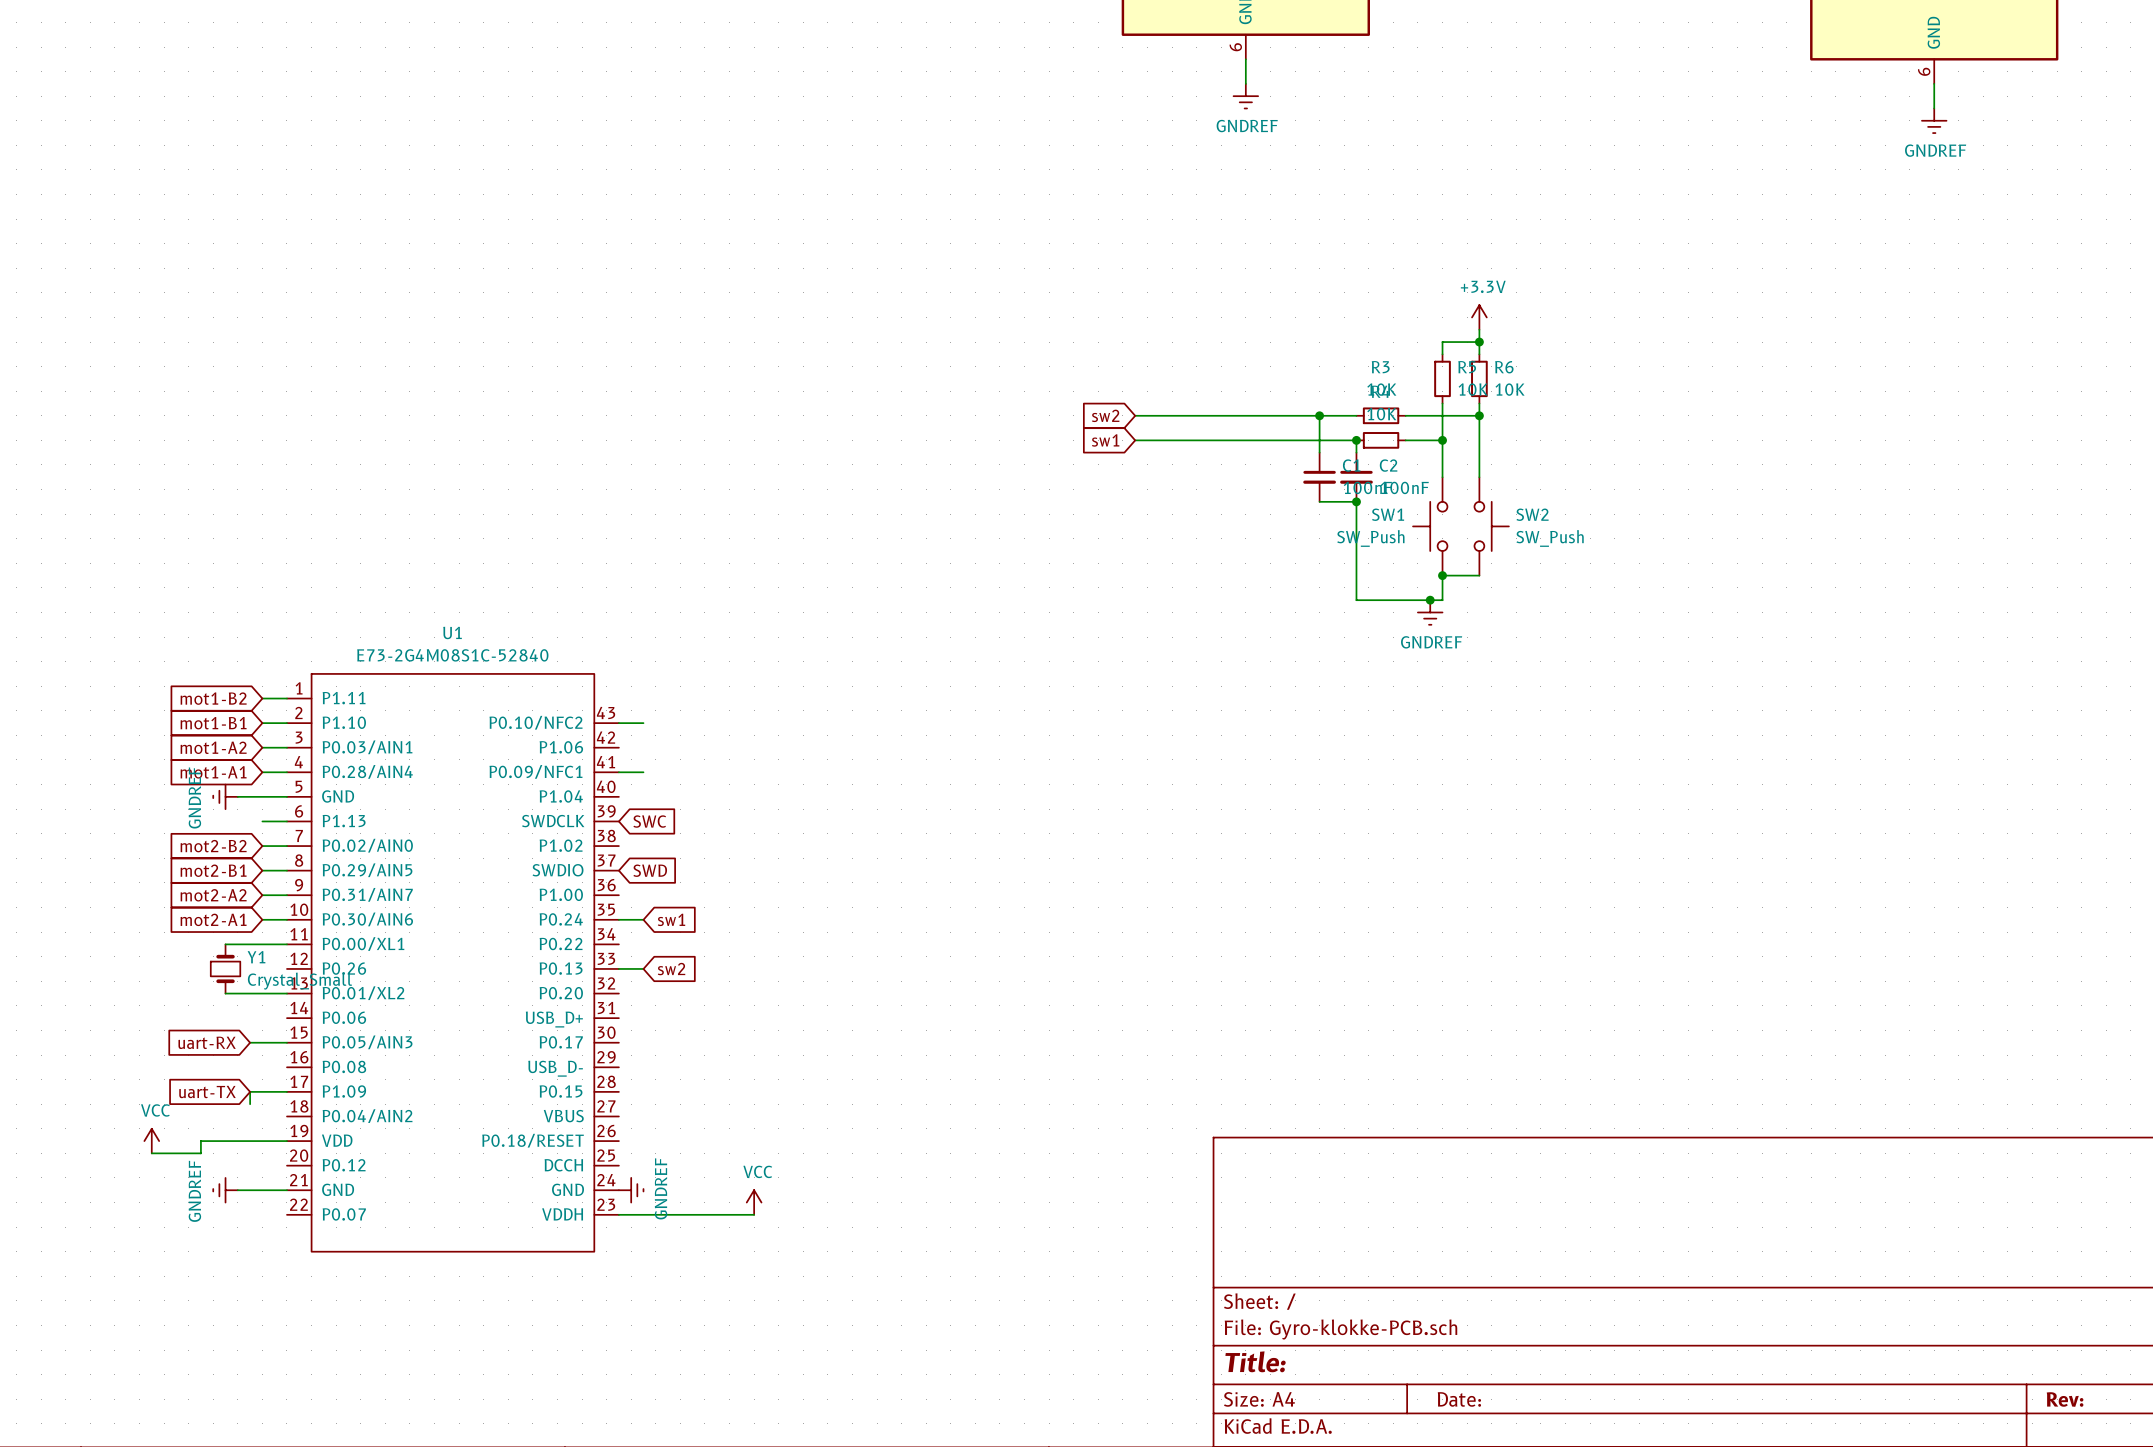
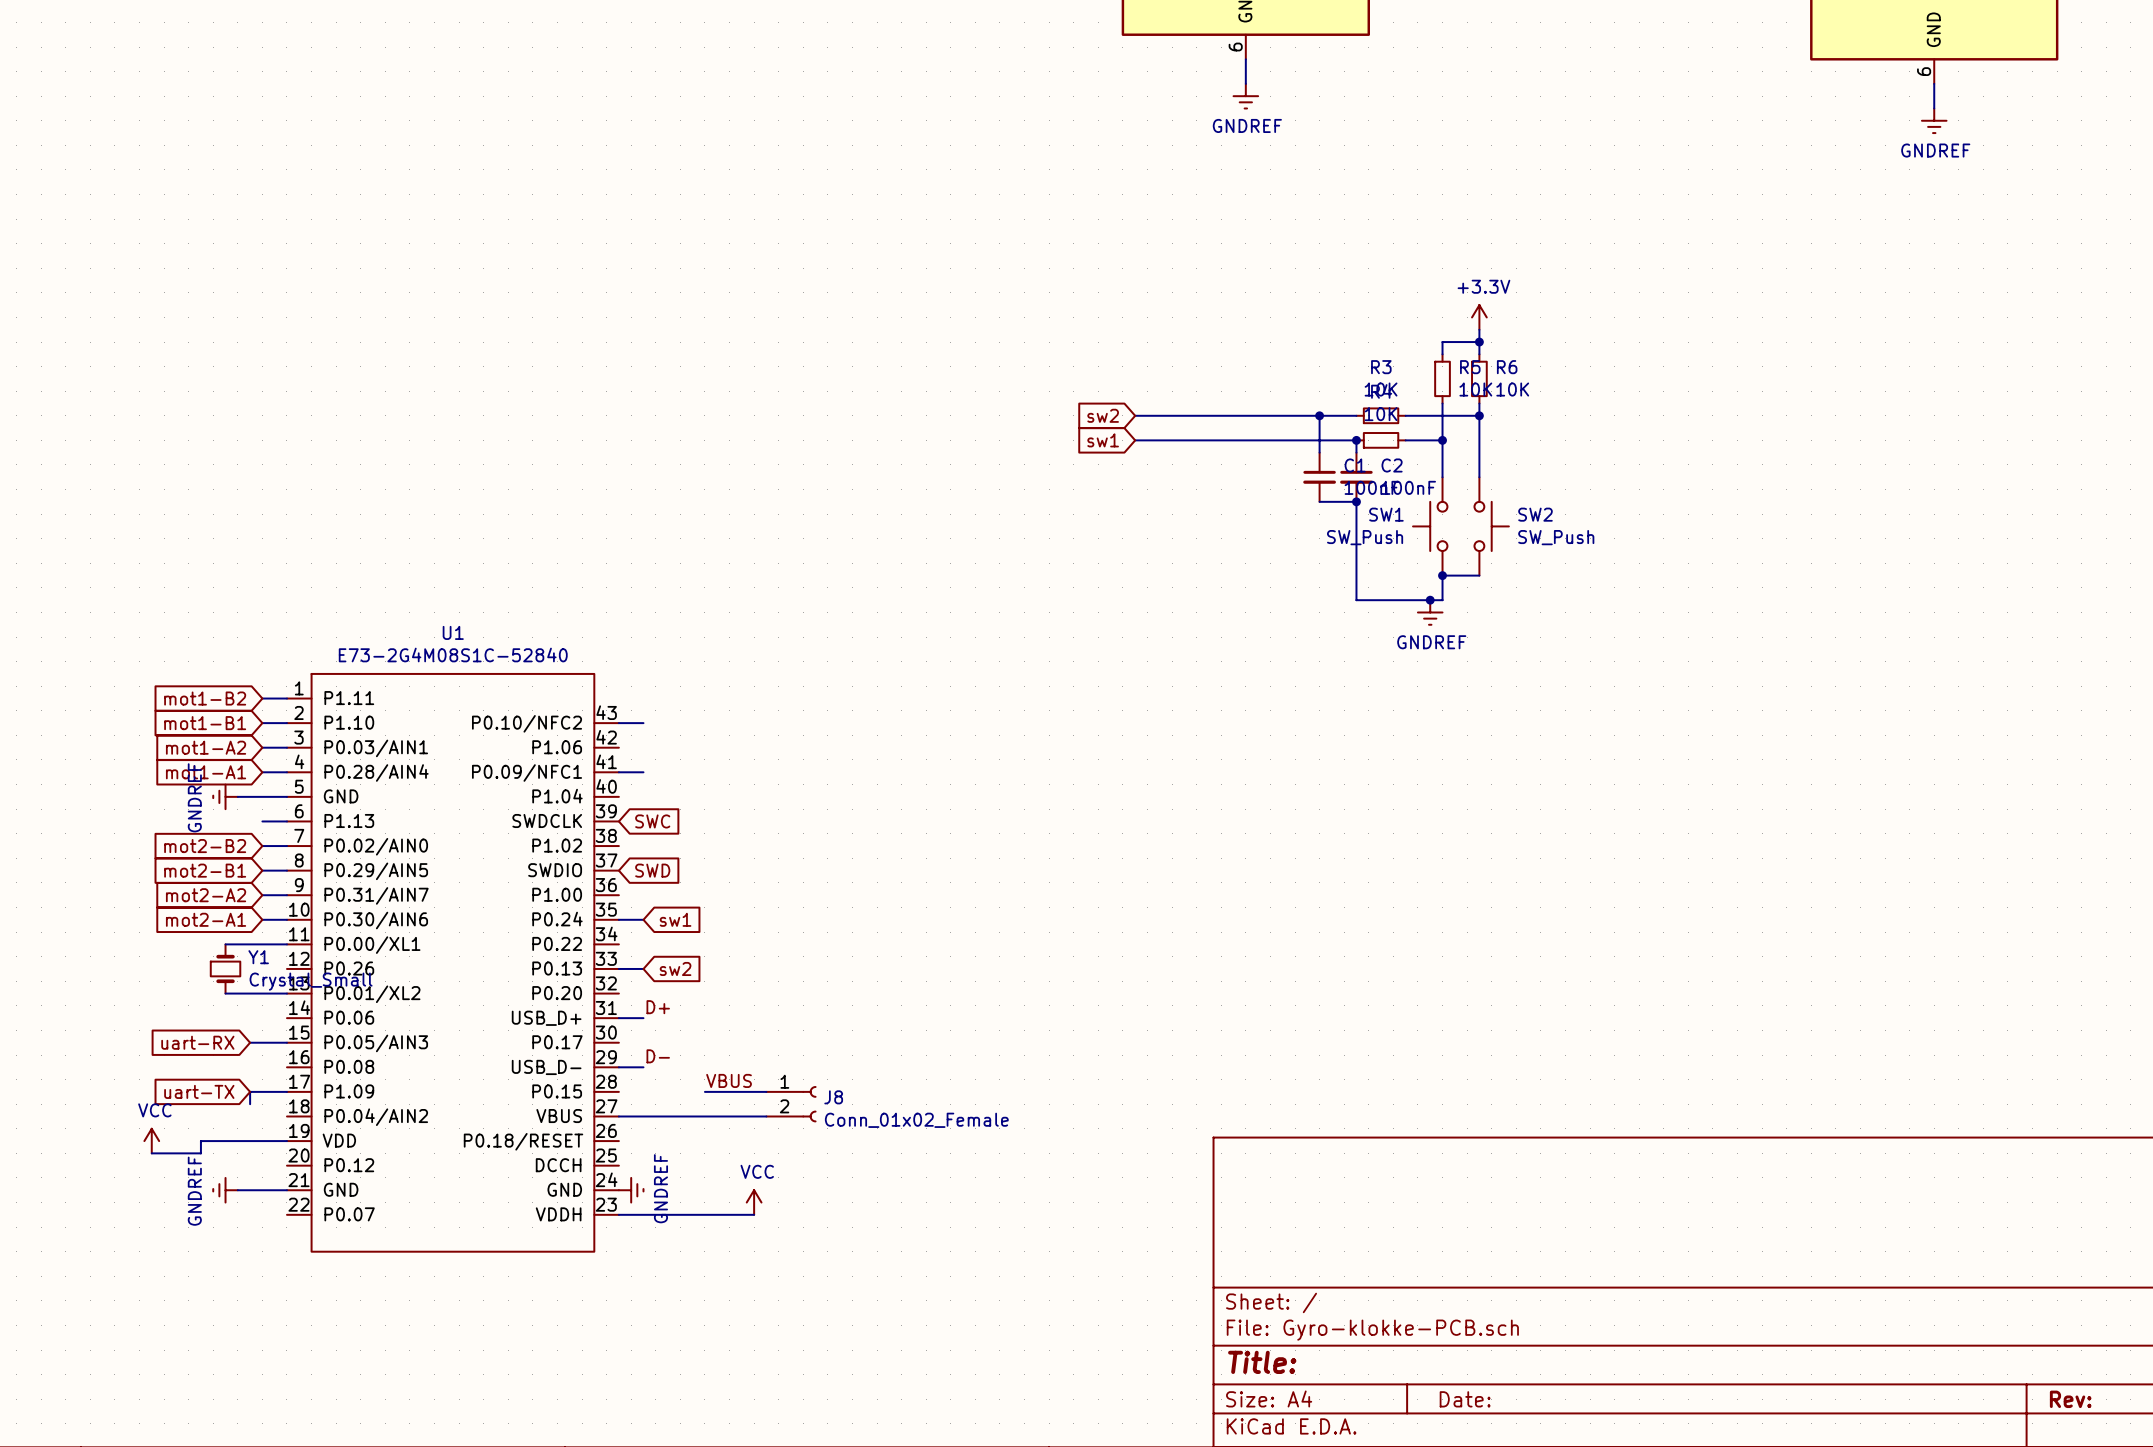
label: none -> D+ (658, 1007)
wire: none -> (618, 1018) (643, 1018)
label: none -> D- (658, 1056)
wire: none -> (618, 1067) (643, 1067)
label: none -> VBUS (729, 1080)
wire: none -> (704, 1091) (766, 1091)
J8: none -> Conn_01x02_Female (791, 1104)
wire: none -> (618, 1116) (766, 1116)

